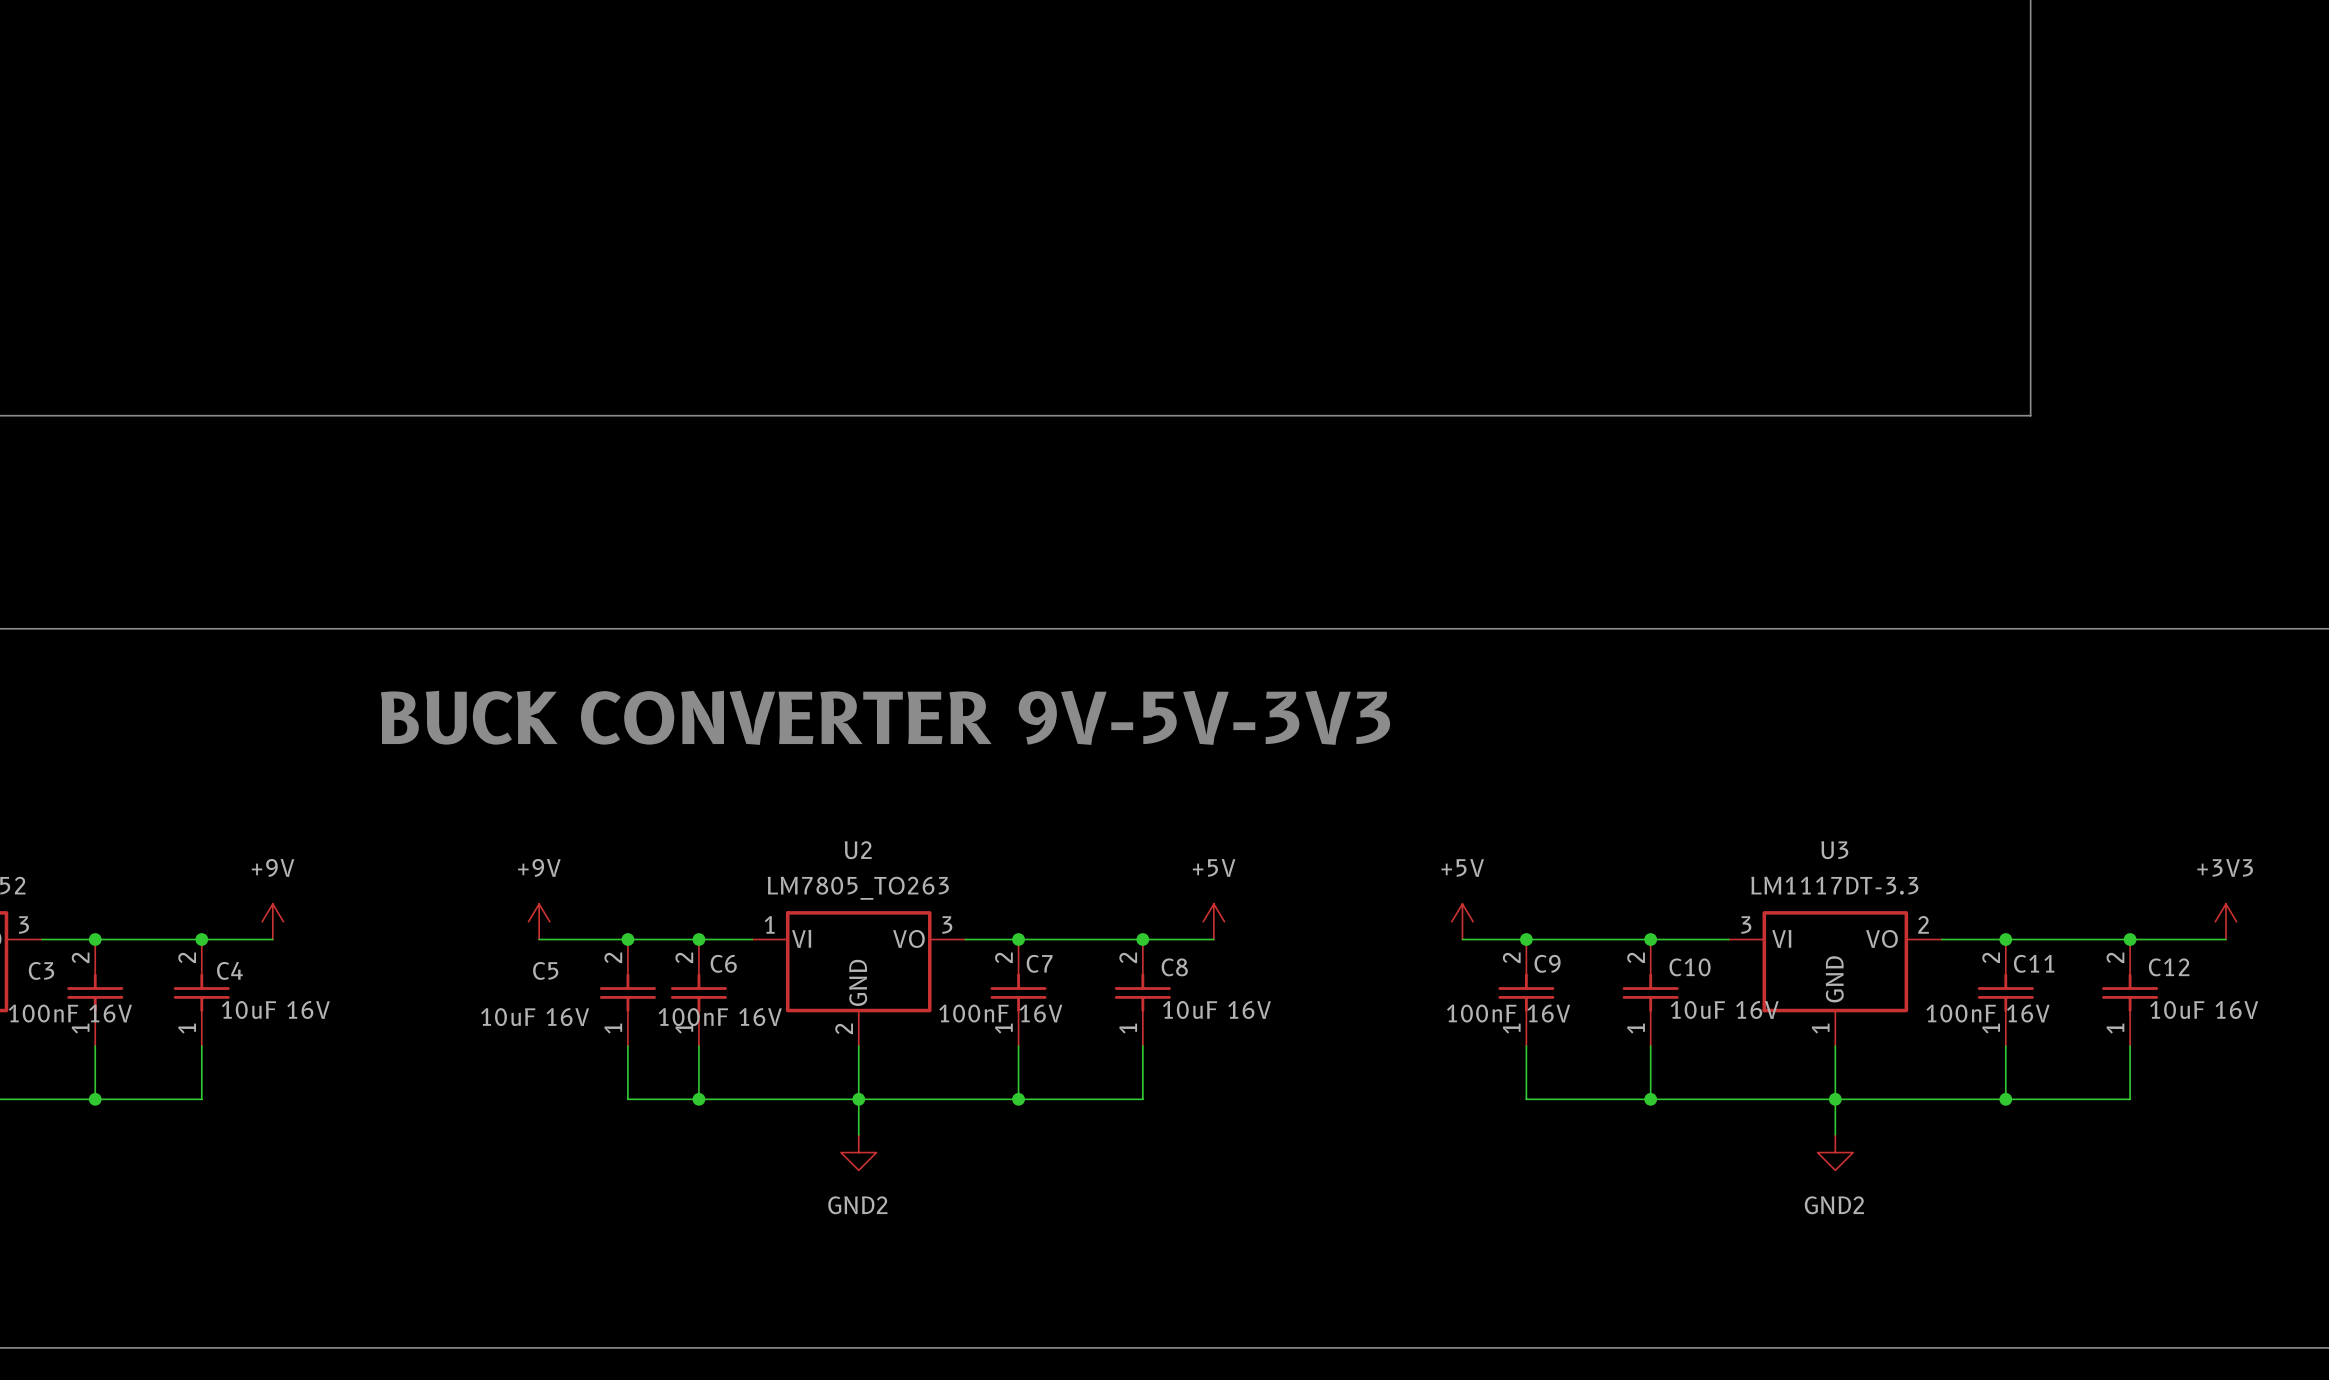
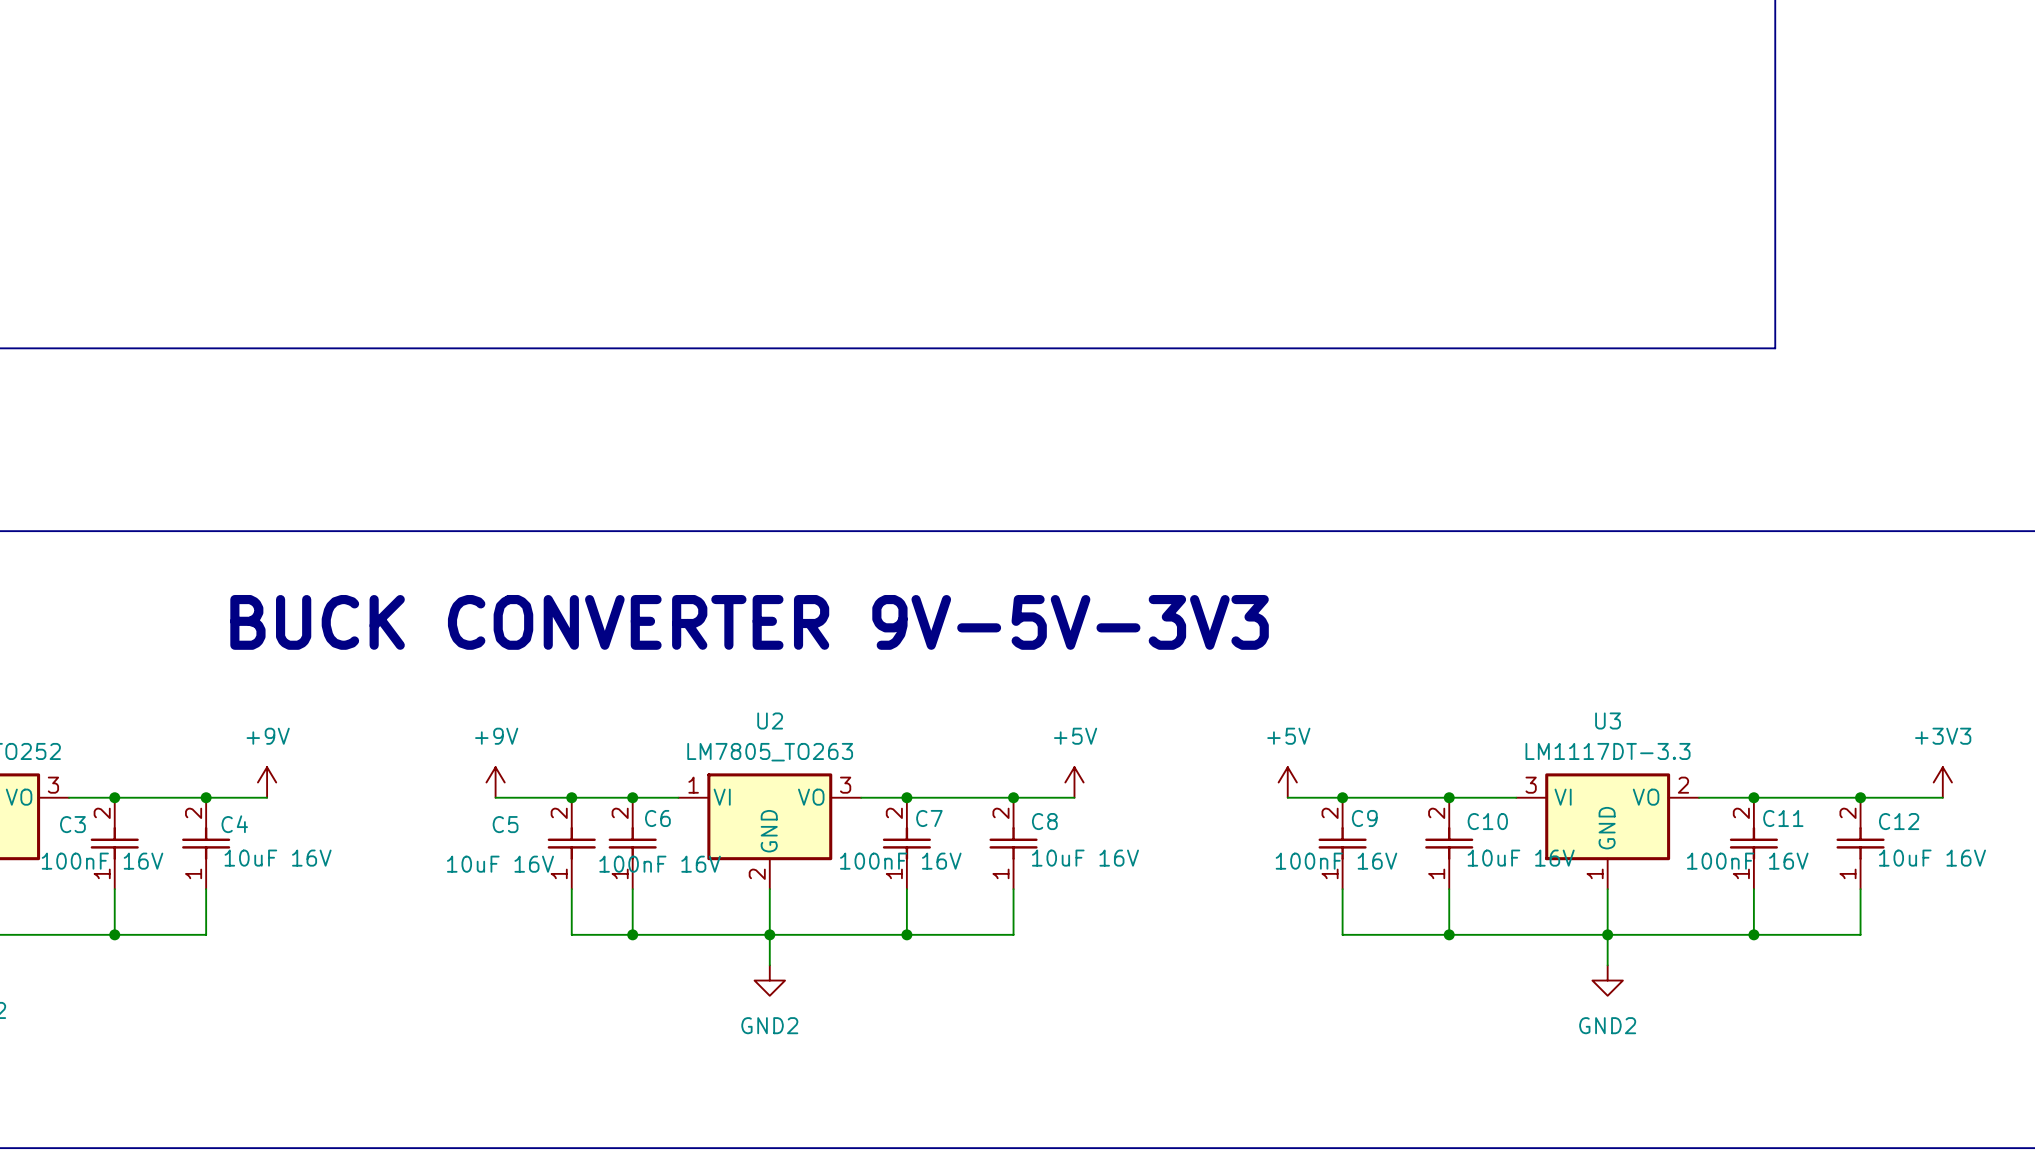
text position: BUCK CONVERTER 9V-5V-3V3 (885, 717) -> BUCK CONVERTER 9V-5V-3V3 (749, 622)

